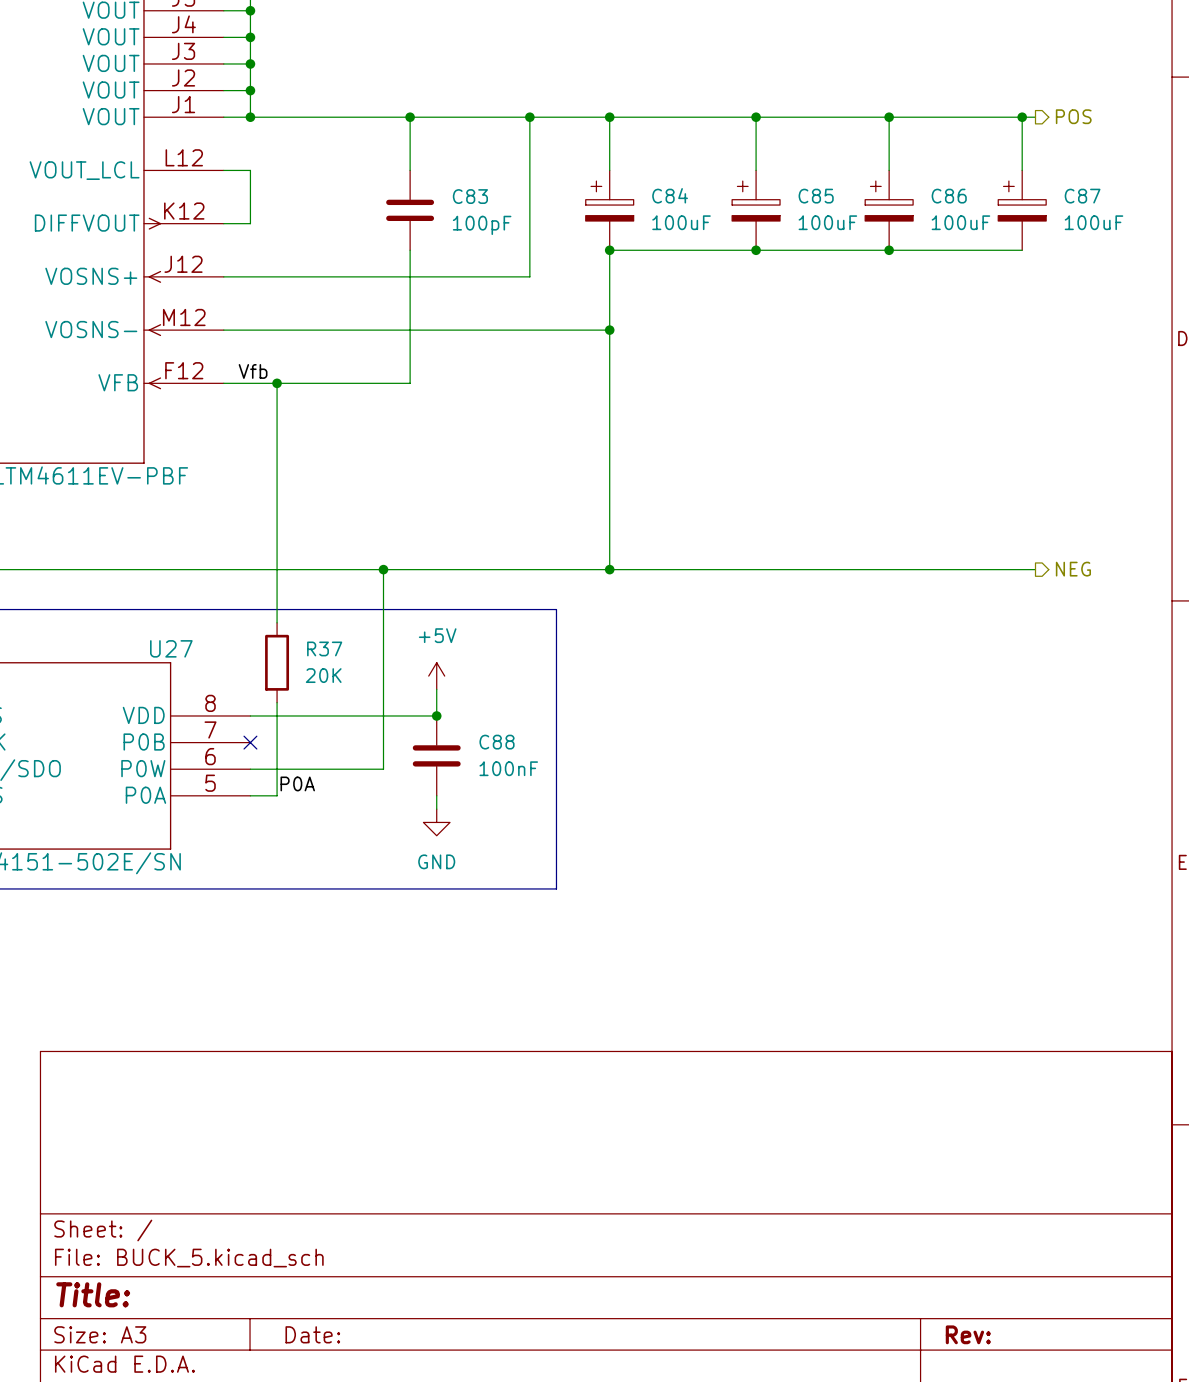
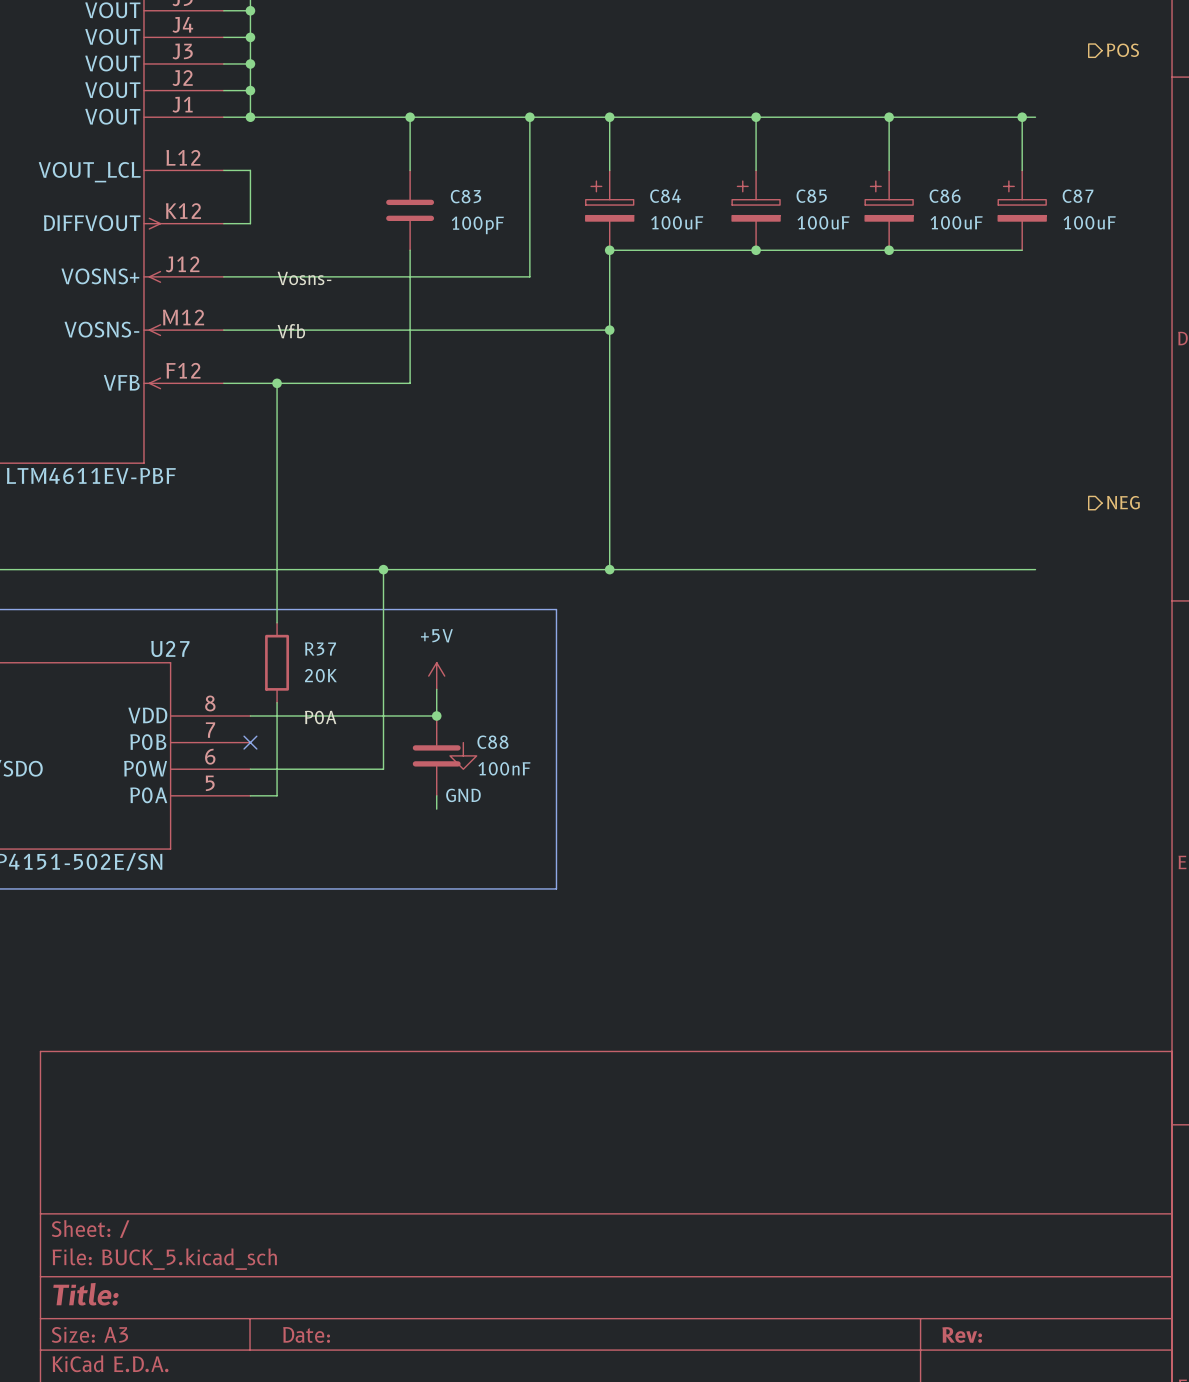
hierarchical label position: POS (1073, 116) -> POS (1122, 50)
label: none -> Vosns- (304, 278)
label position: Vfb (253, 371) -> Vfb (291, 331)
hierarchical label position: NEG (1073, 569) -> NEG (1123, 502)
label position: P0A (297, 783) -> P0A (320, 717)
power symbol position: GND (436, 822) -> GND (463, 755)

